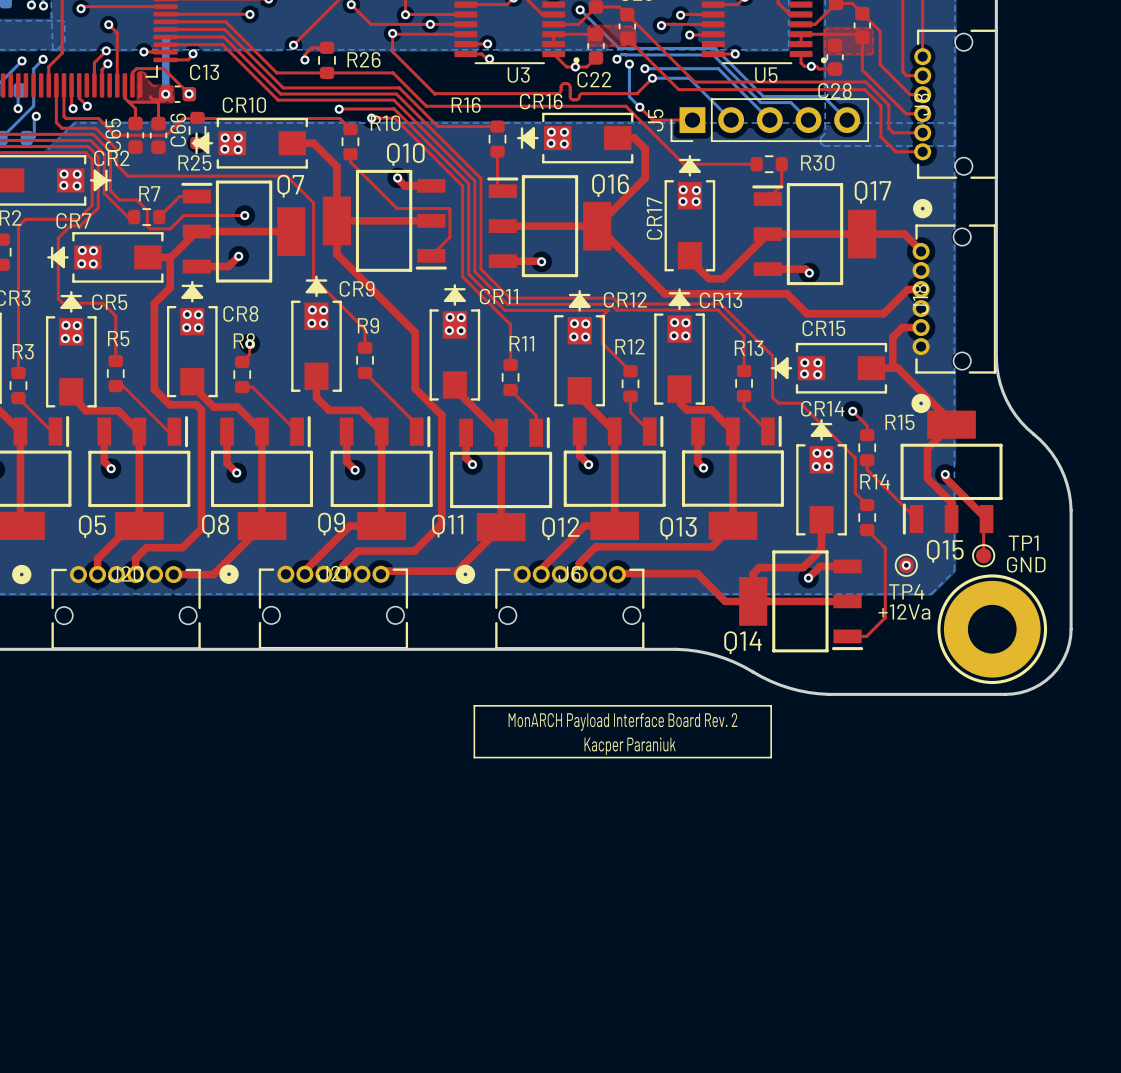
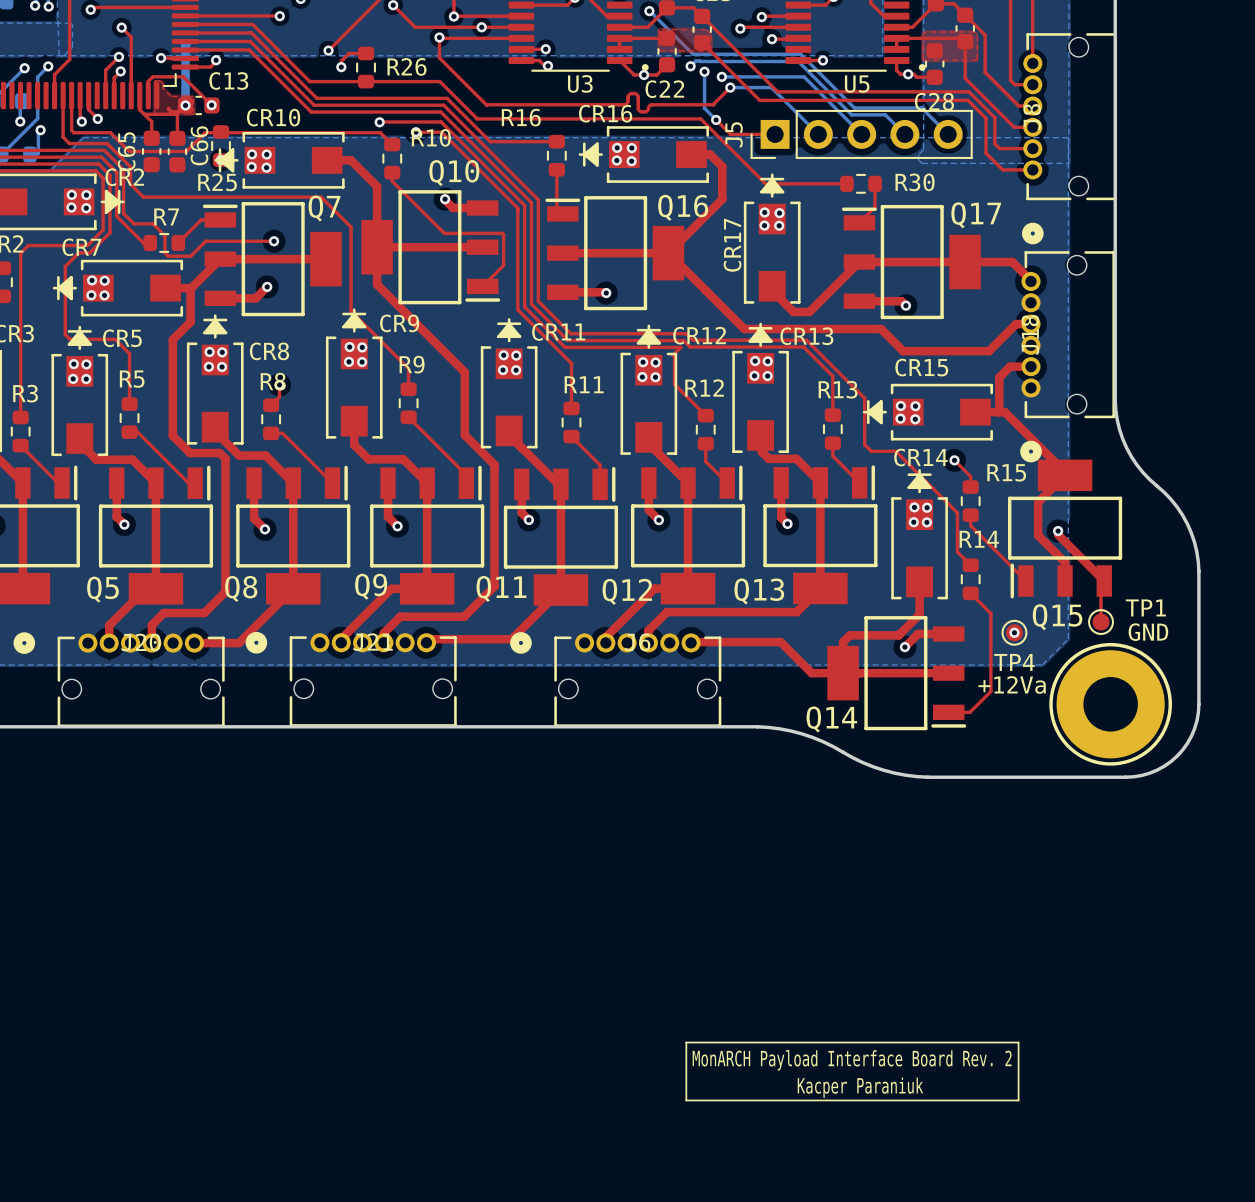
line: (474, 705) (771, 705) (771, 757) (474, 757) (474, 705) -> (686, 1042) (1018, 1042) (1018, 1100) (686, 1100) (686, 1042)
text position: MonARCH Payload Interface Board Rev. 2 (623, 722) -> MonARCH Payload Interface Board Rev. 2 (852, 1060)
text position: Kacper Paraniuk (630, 746) -> Kacper Paraniuk (860, 1087)

